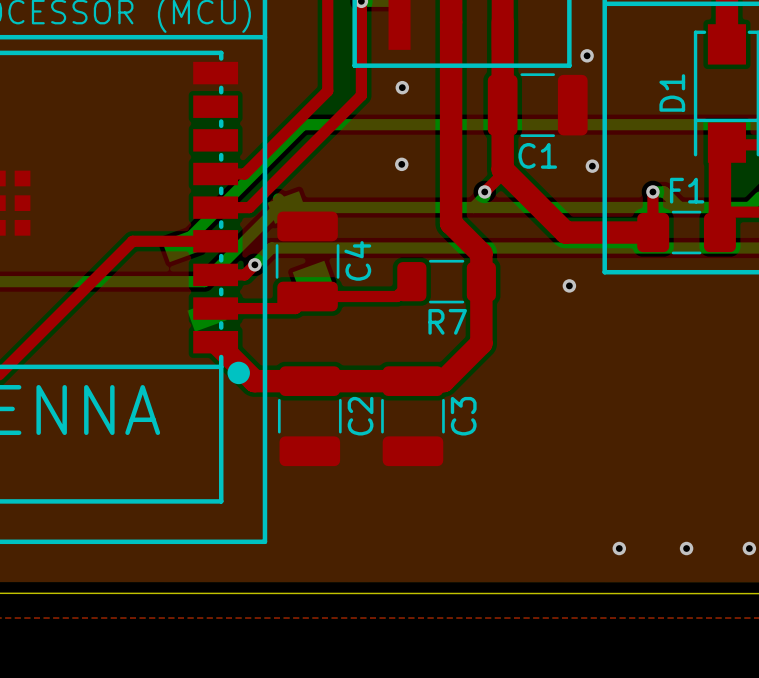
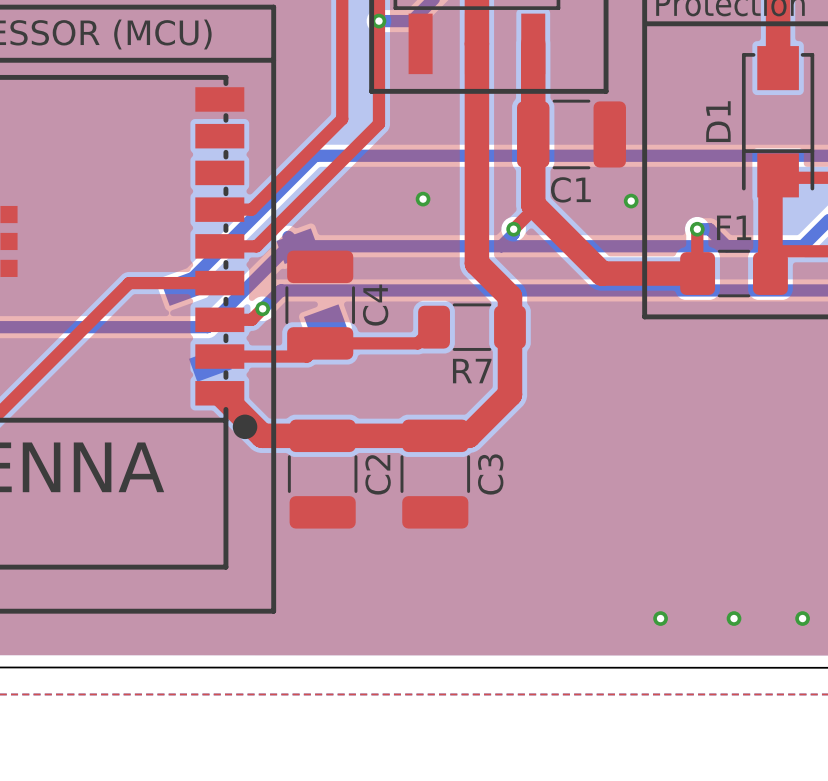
via: (587, 55) -> none
via: (402, 87) -> none
via: (569, 285) -> none

